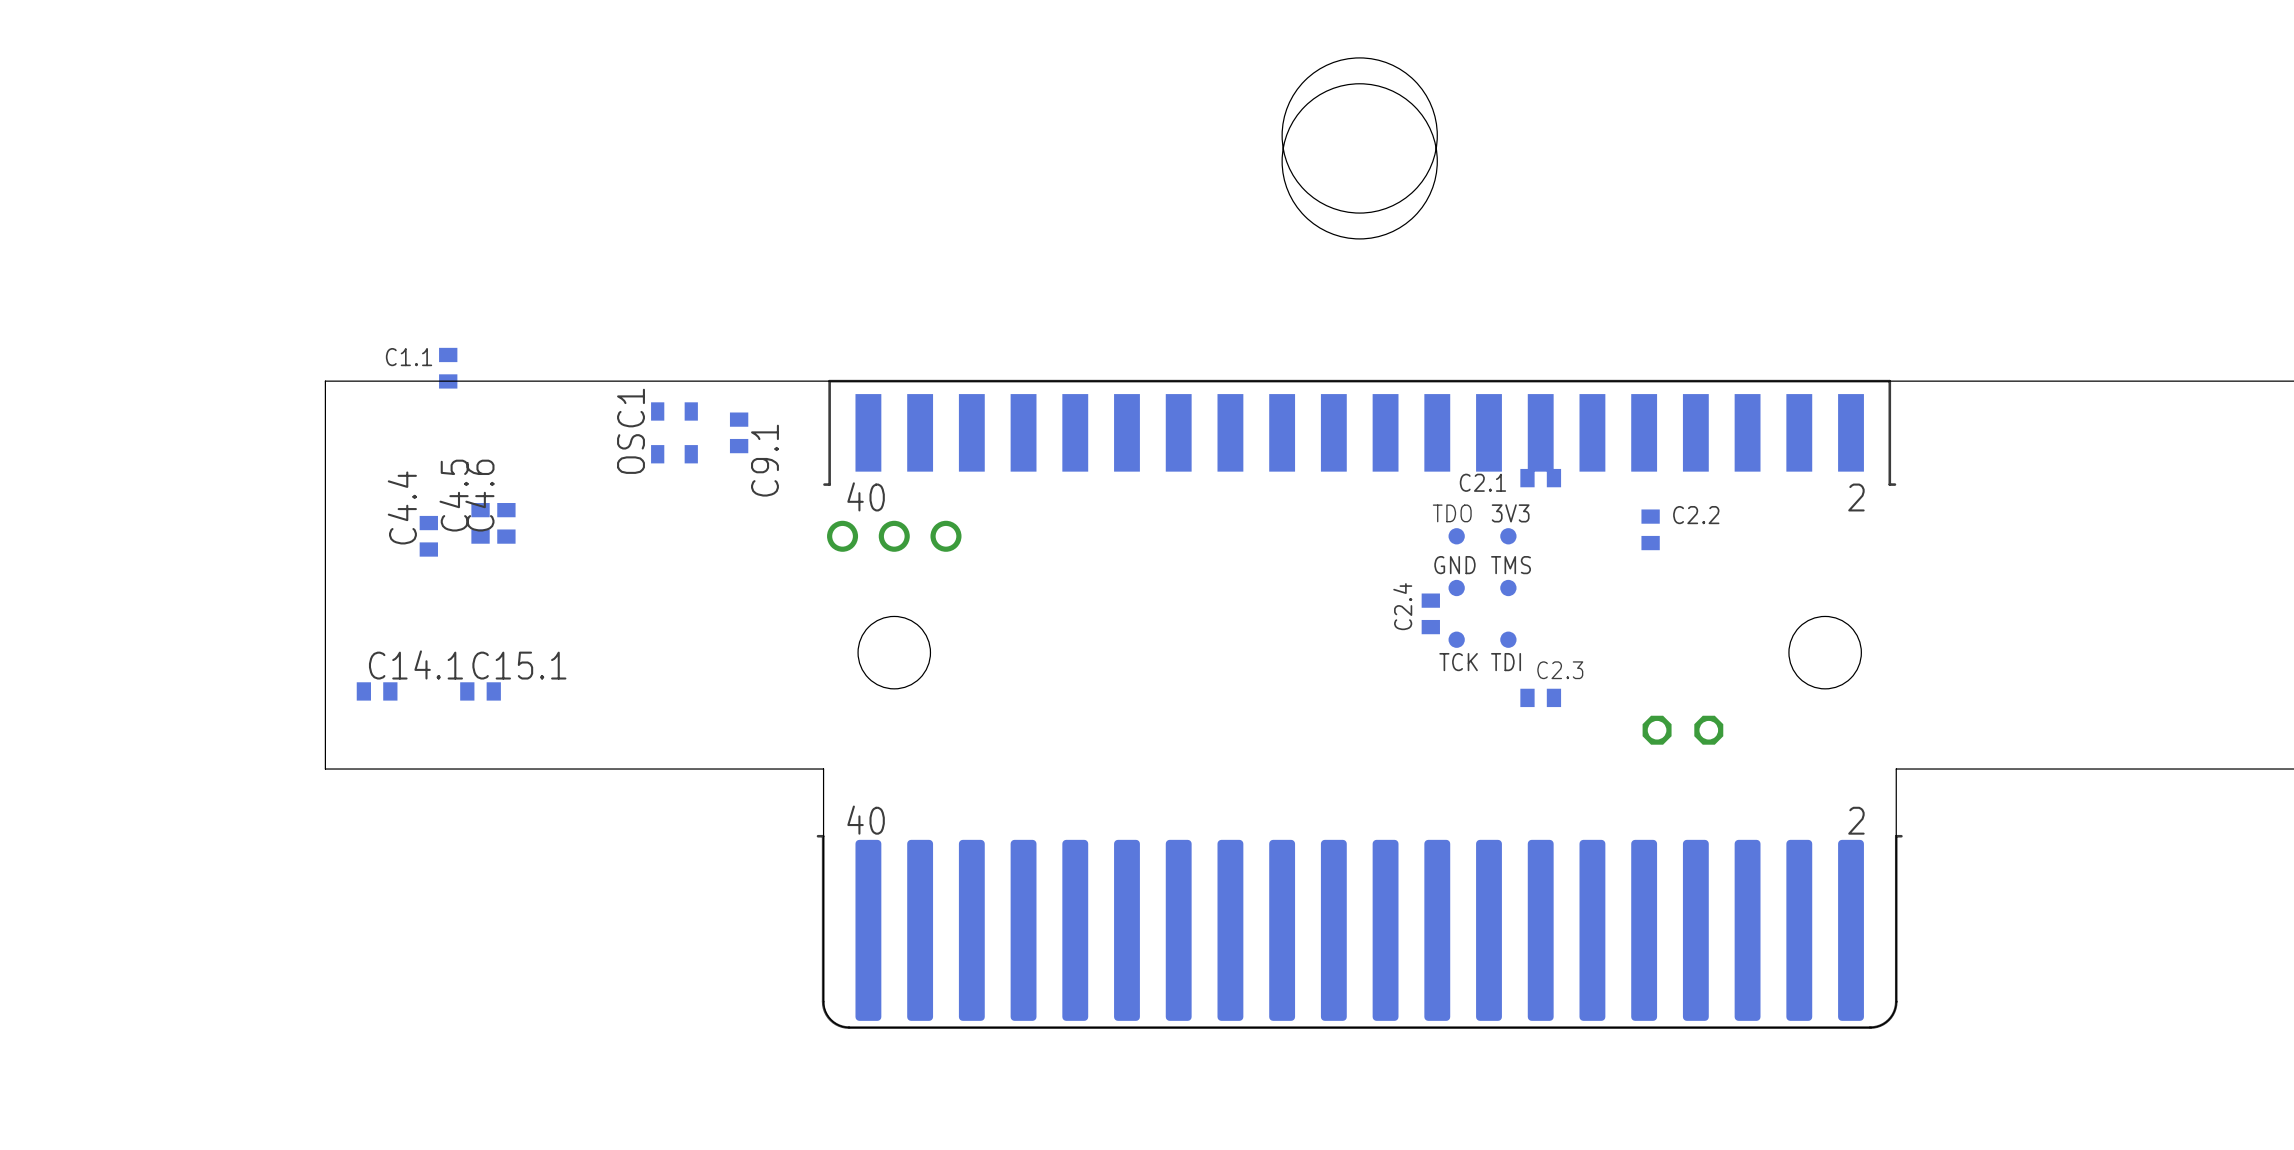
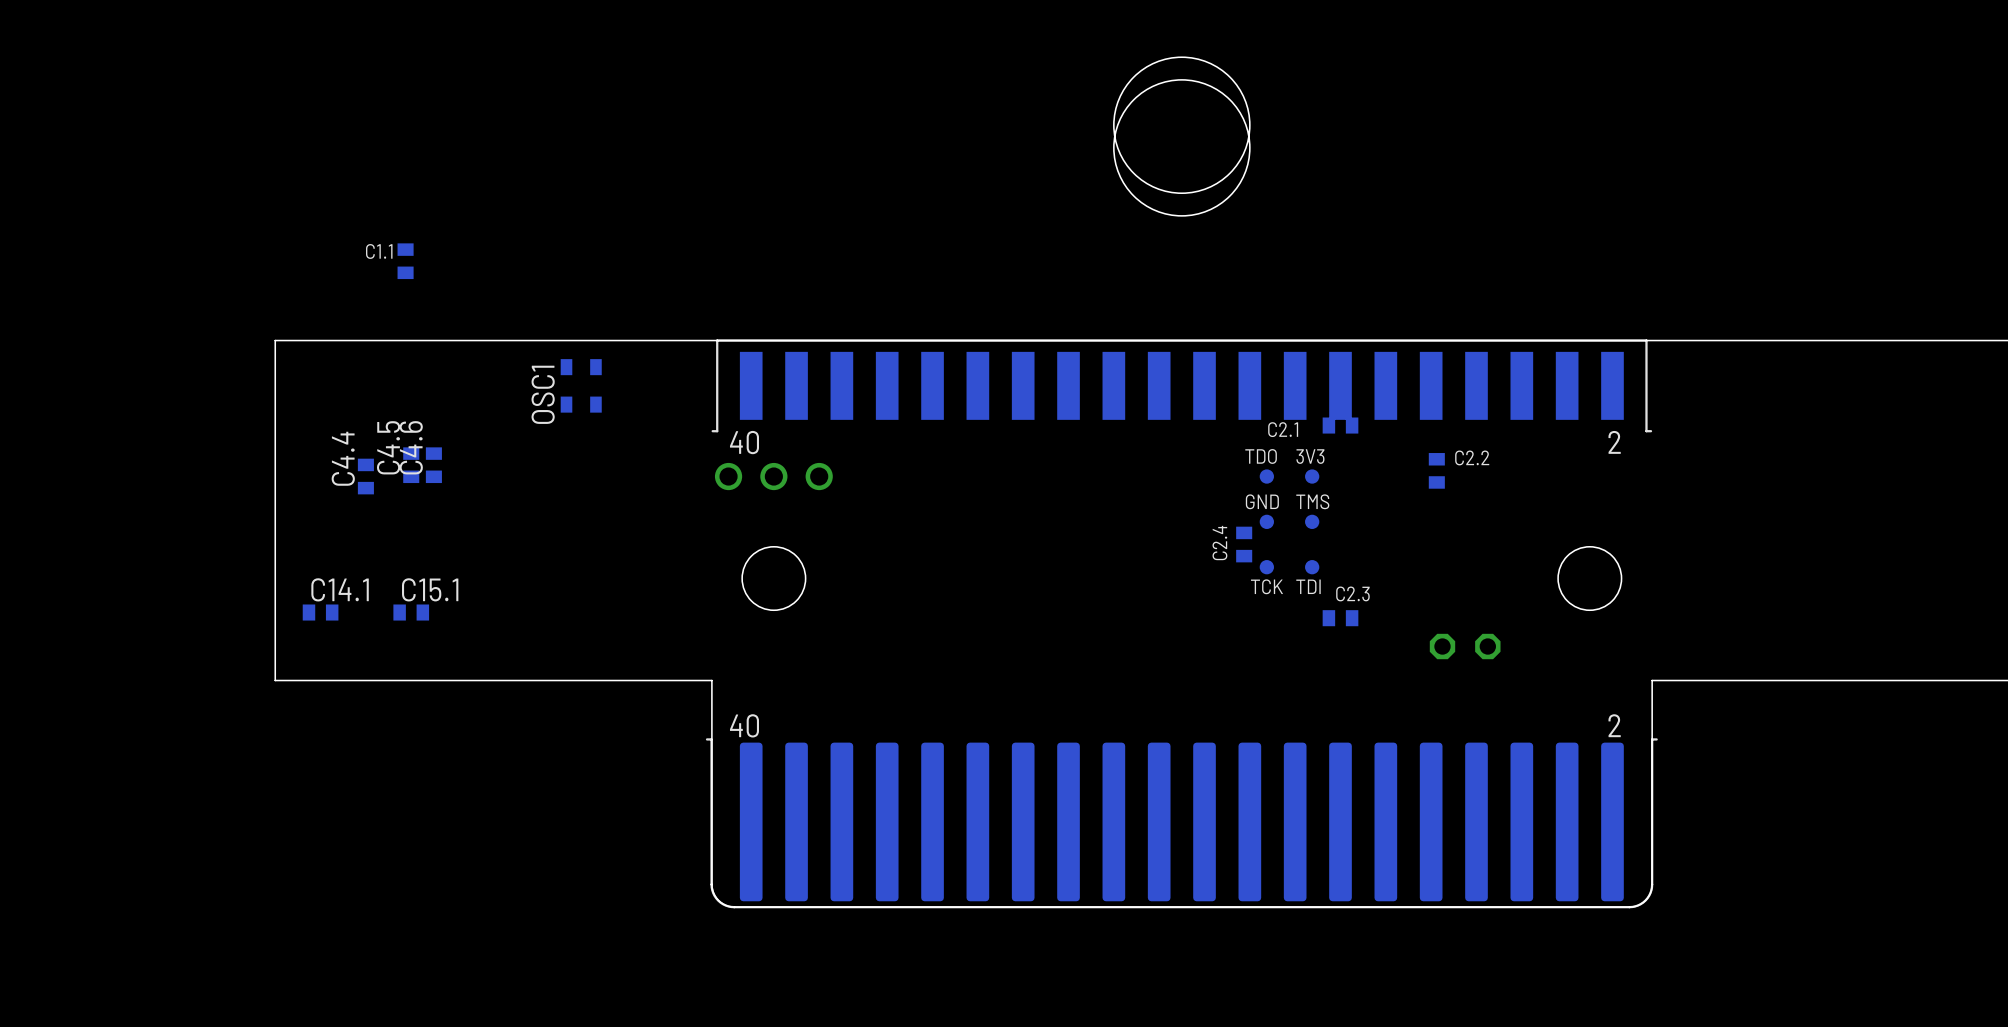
C1.1 position: (448, 368) -> (405, 261)
C9.1: (739, 432) -> none

